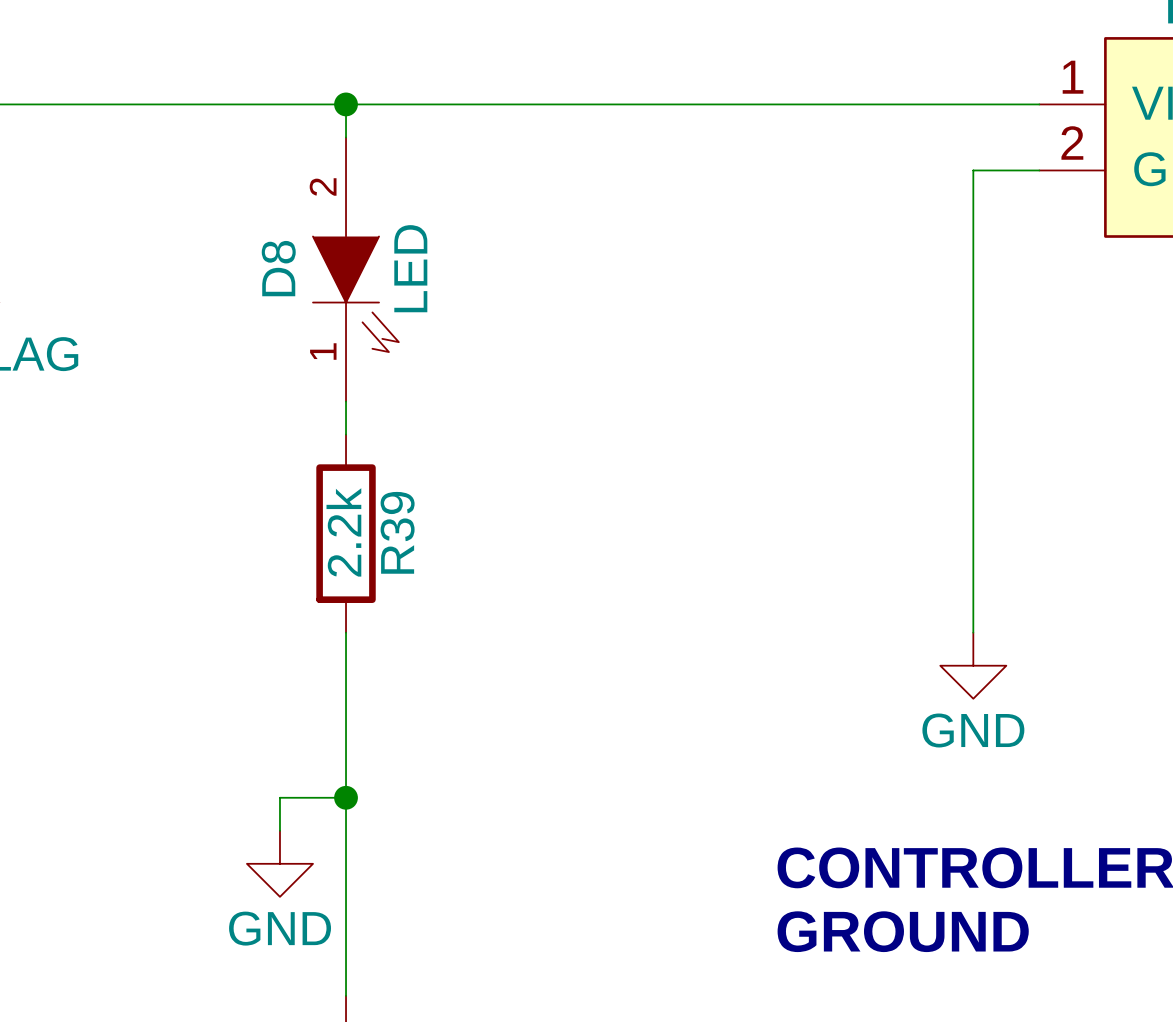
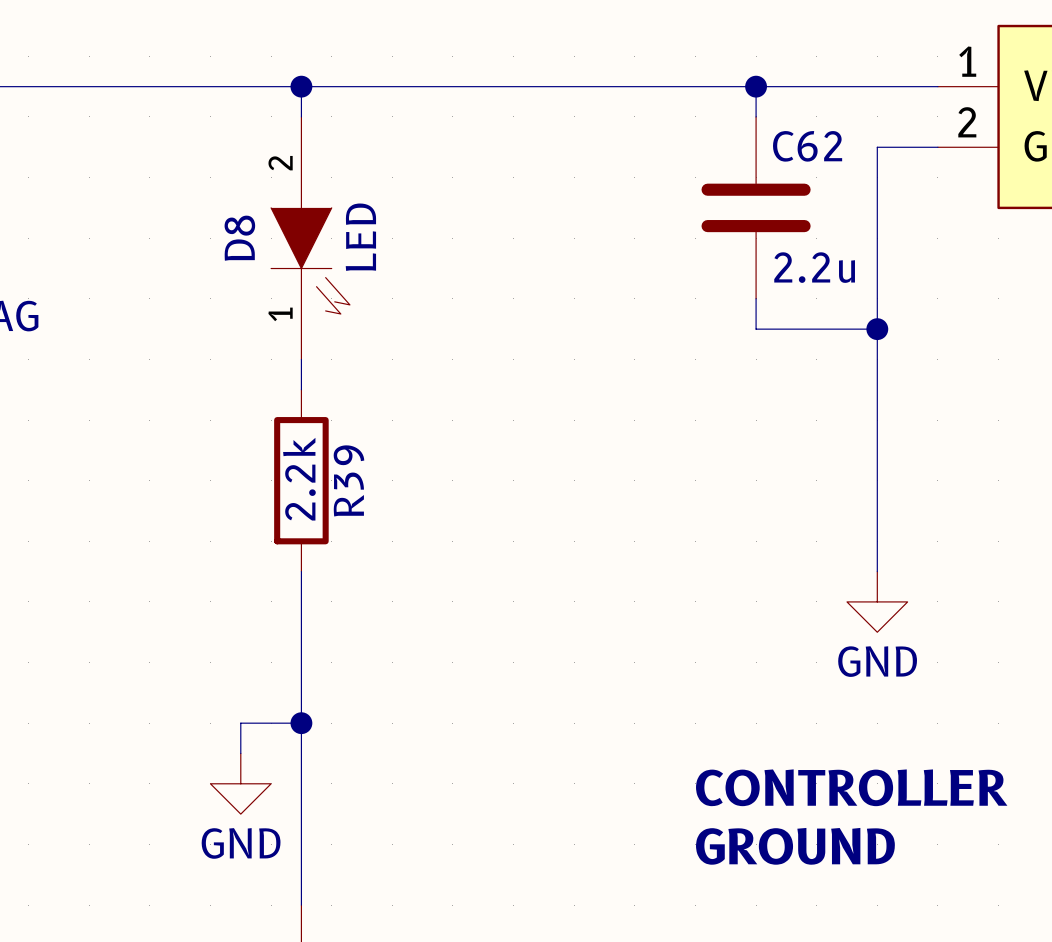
wire: none -> (756, 86) (756, 116)
junction: none -> (756, 86)
C62: none -> 2.2u (756, 207)
wire: none -> (756, 298) (756, 329) (877, 329)
junction: none -> (877, 329)

